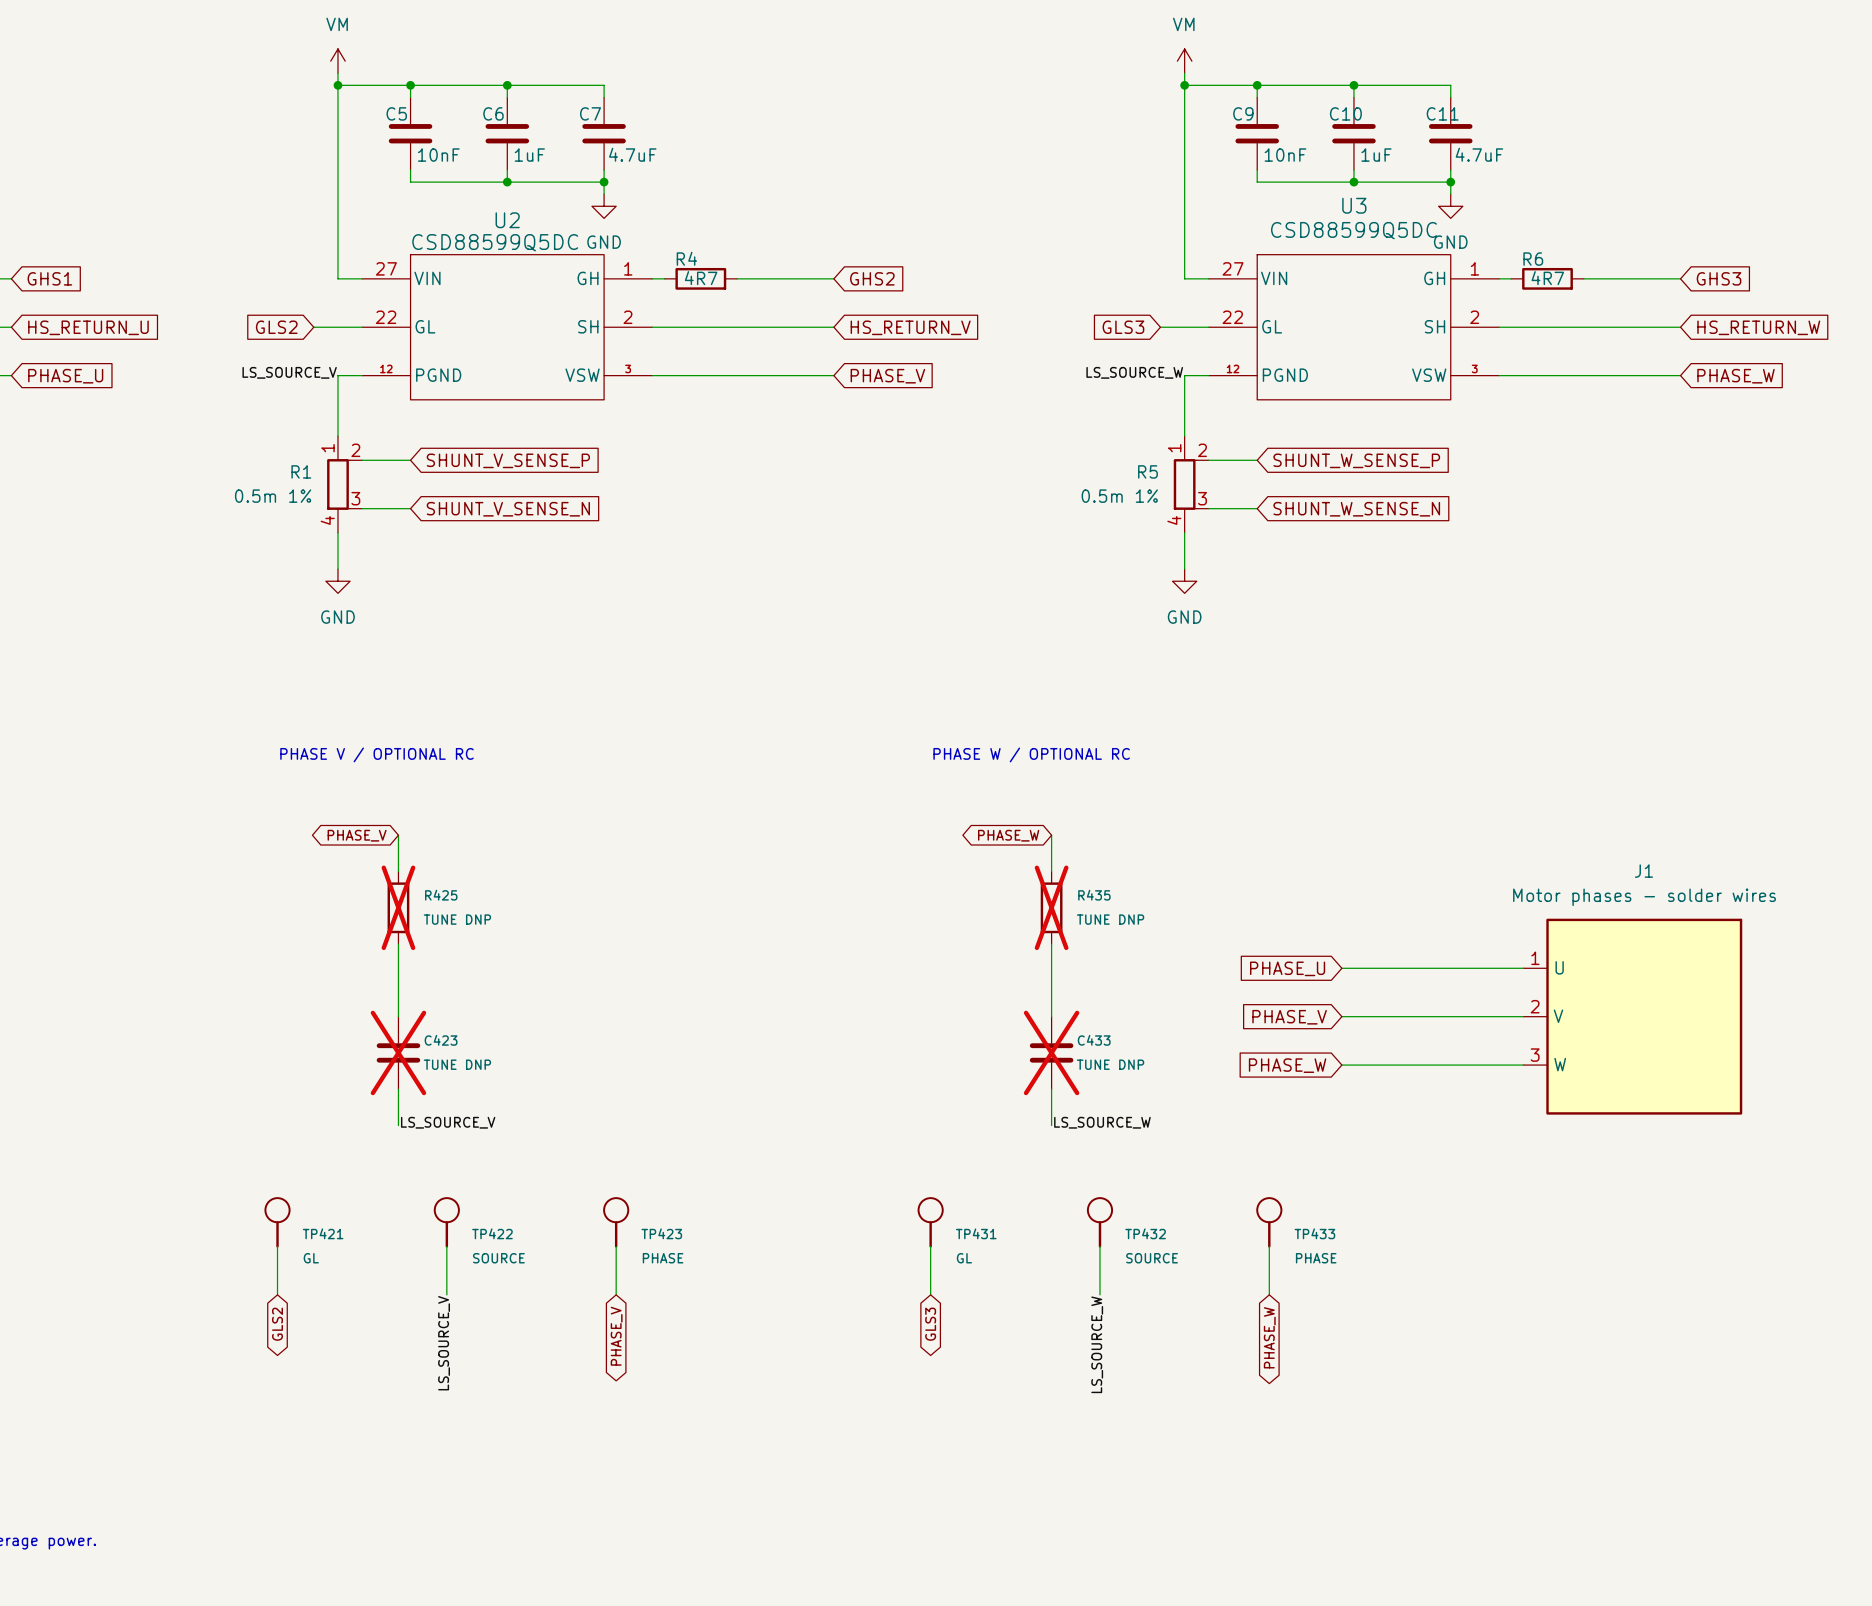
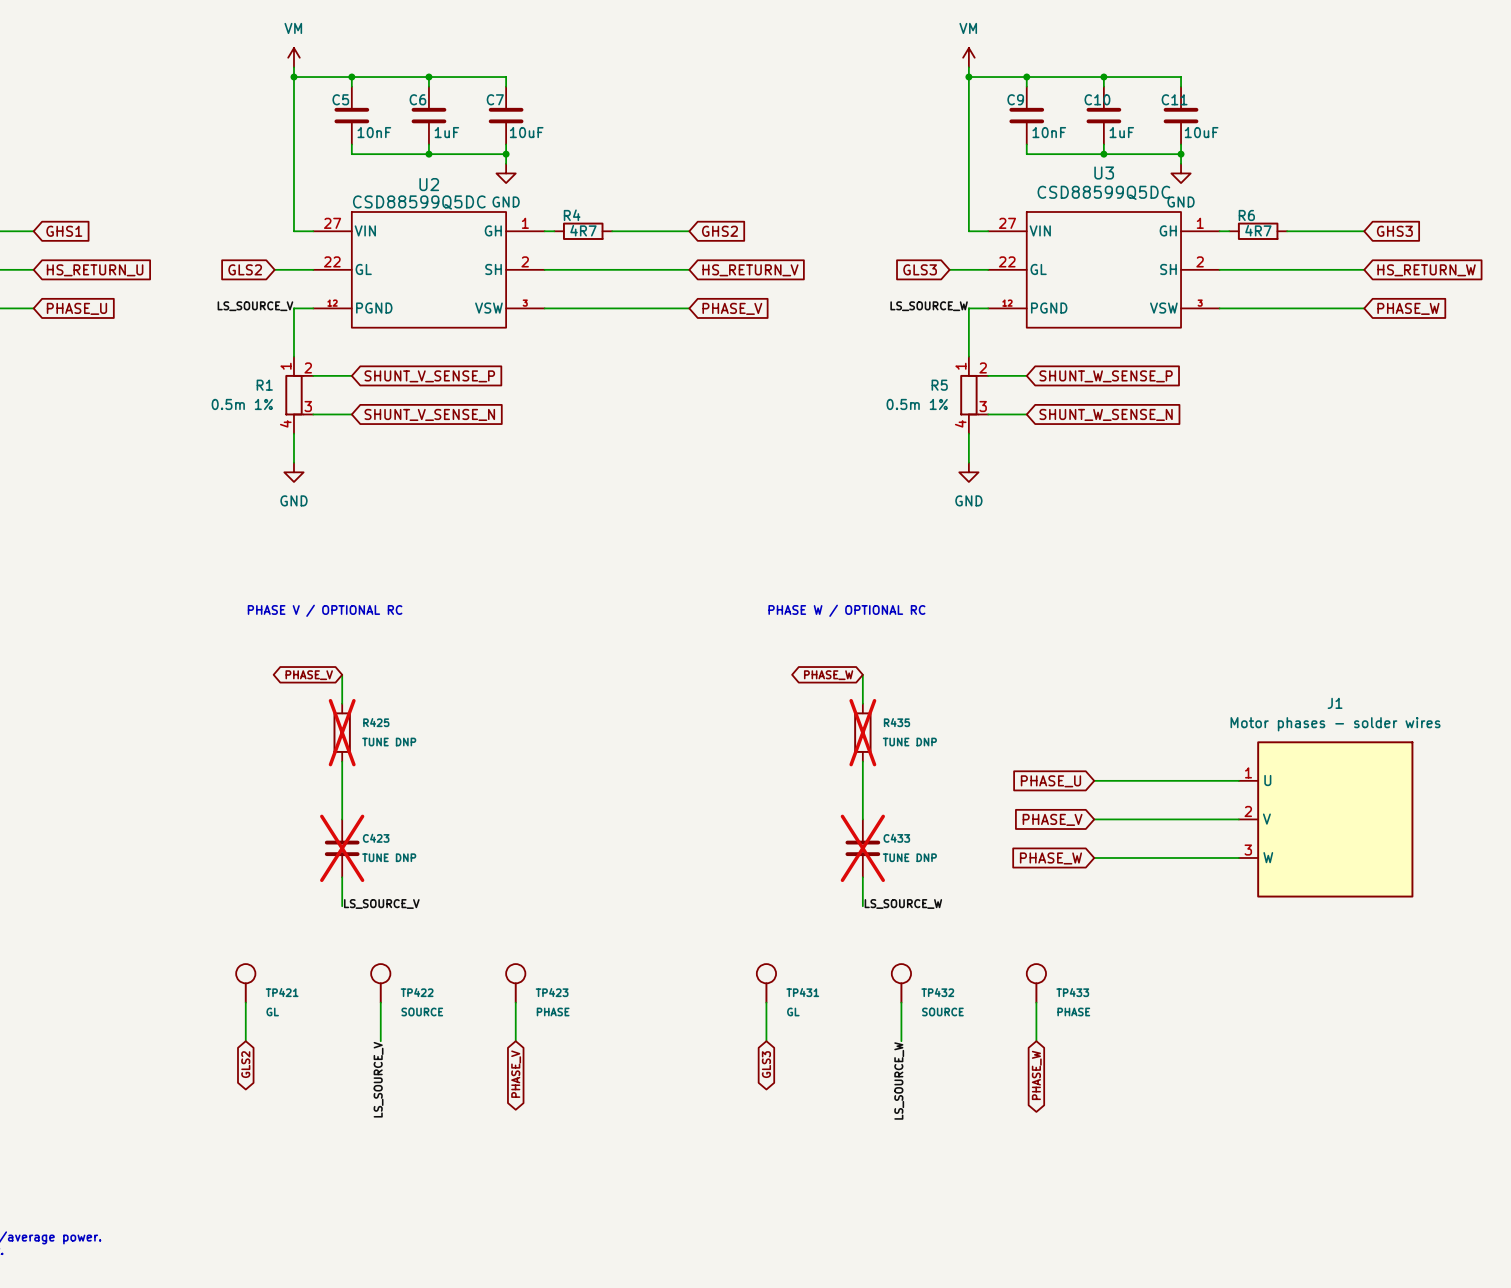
C7 value: 4.7uF (632, 154) -> 10uF (526, 132)
C11 value: 4.7uF (1479, 154) -> 10uF (1201, 132)

